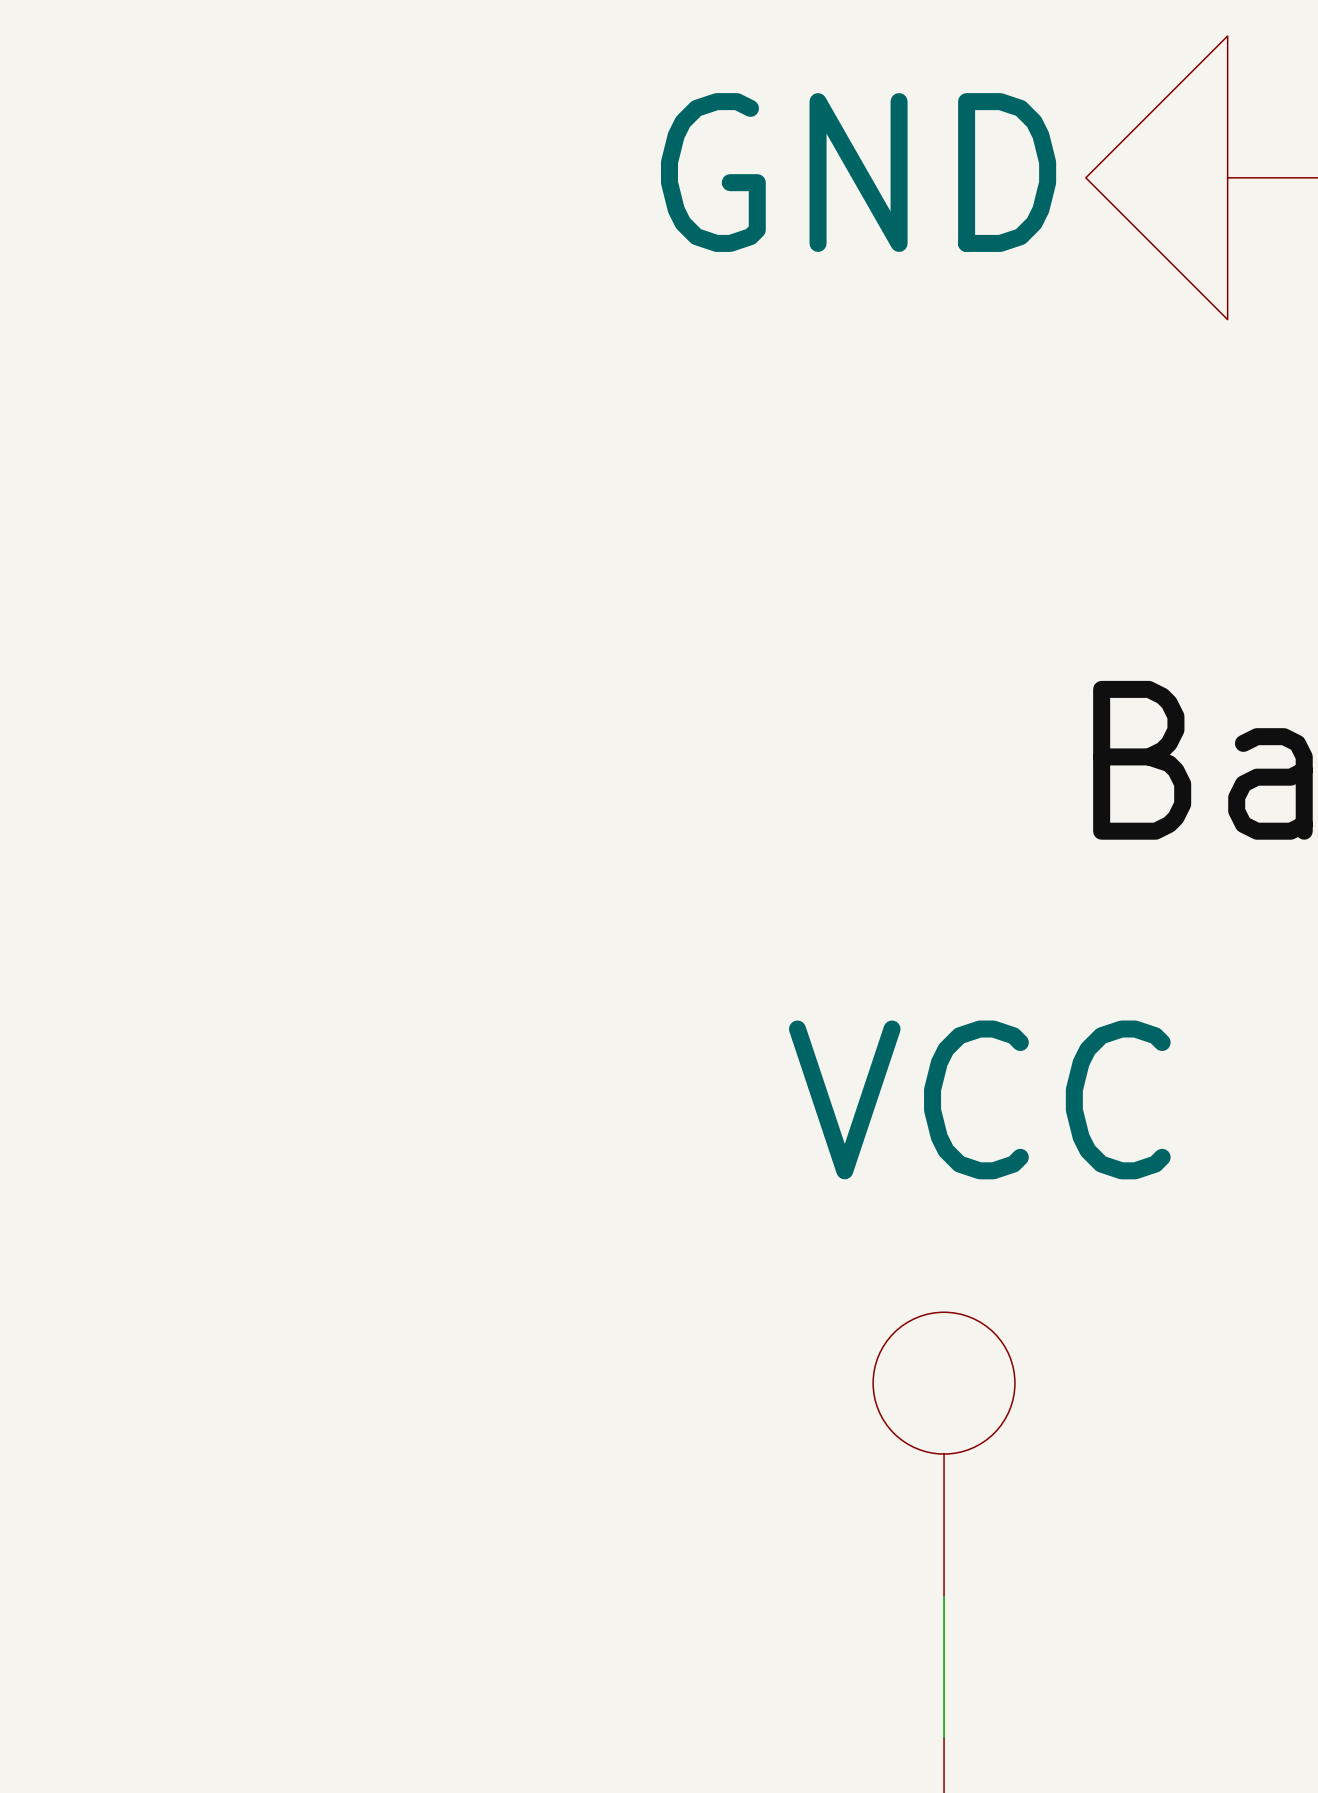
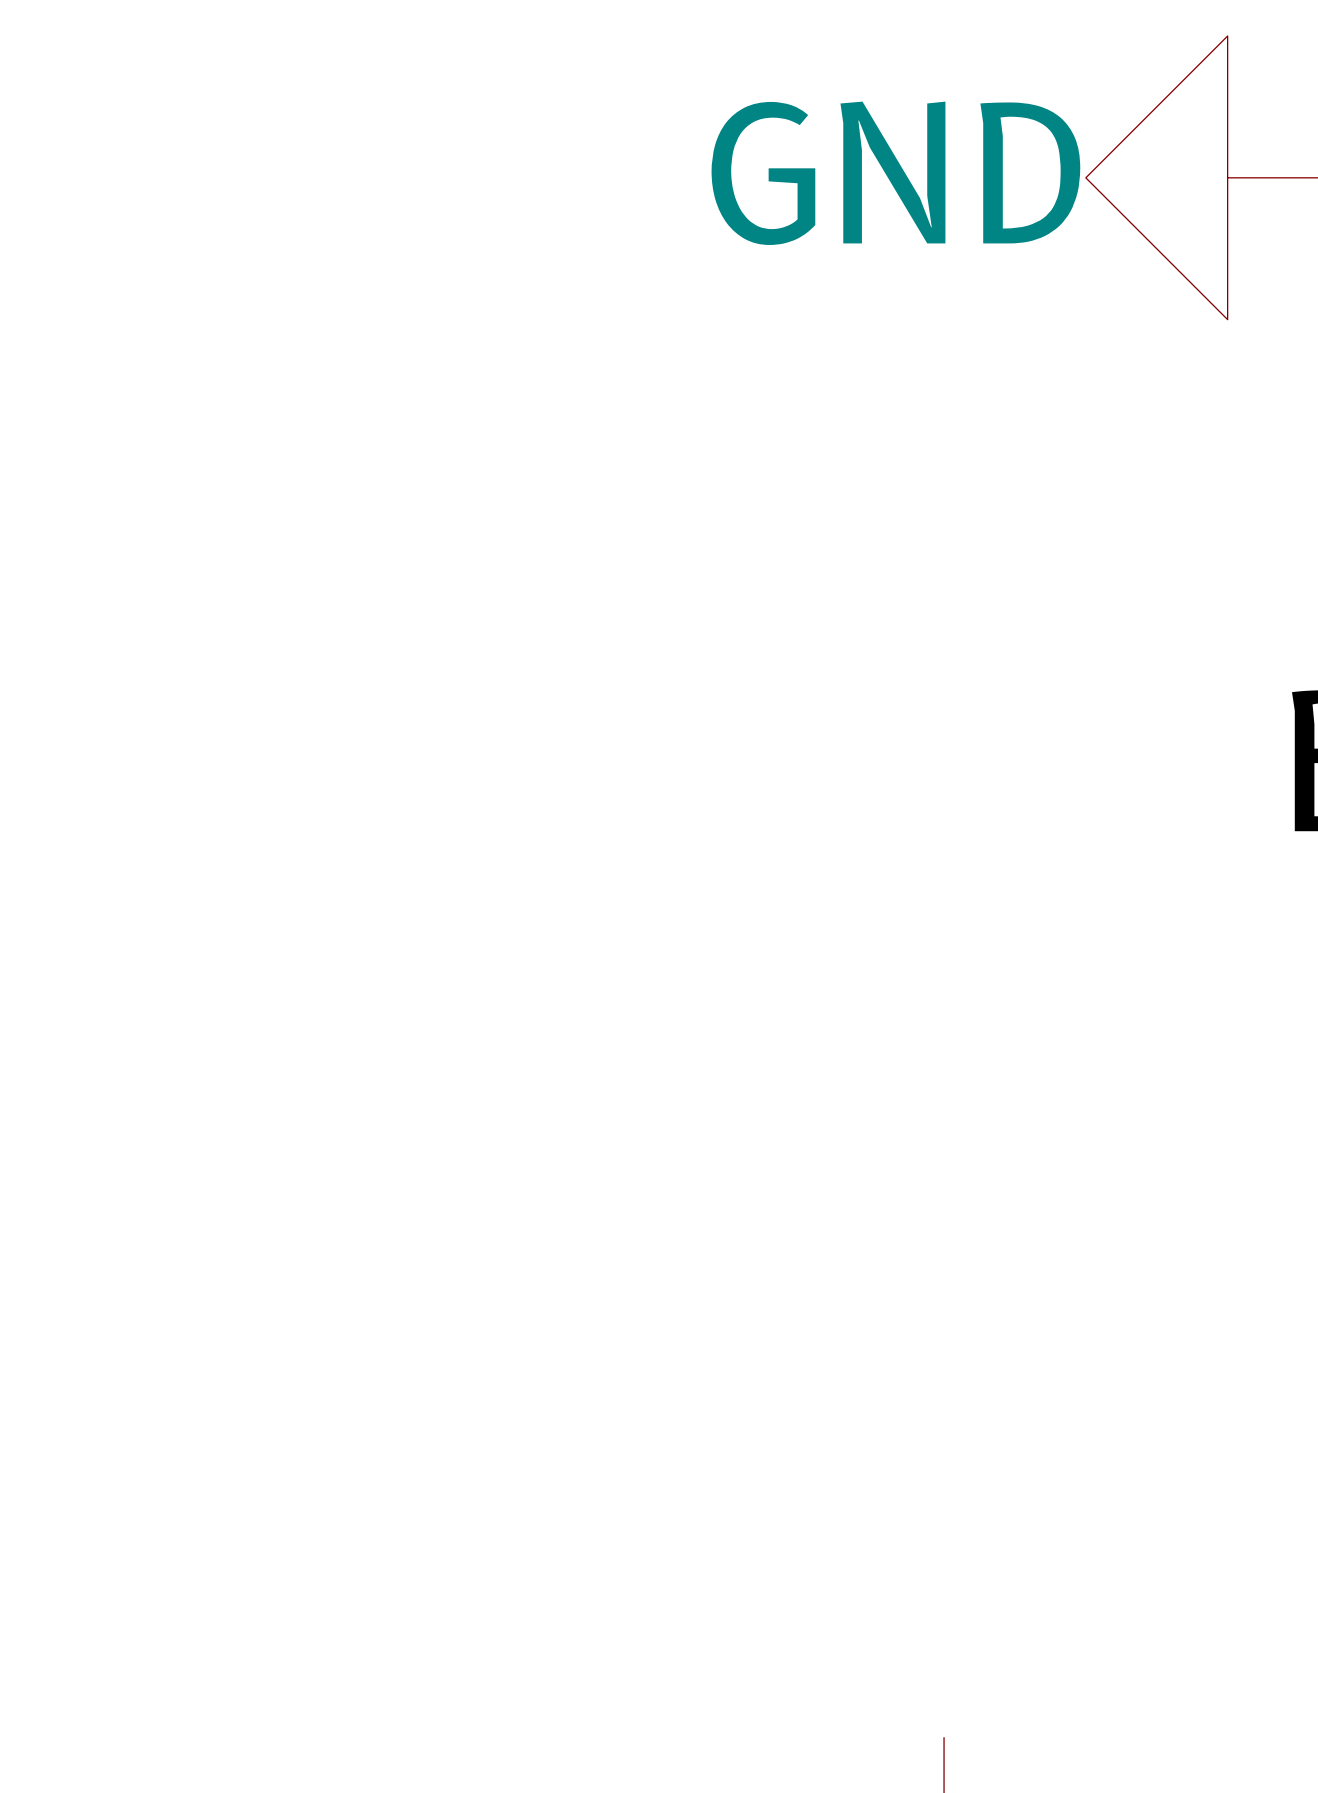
power symbol: VCC (944, 1454) -> none
wire: (944, 1595) (944, 1737) -> none

